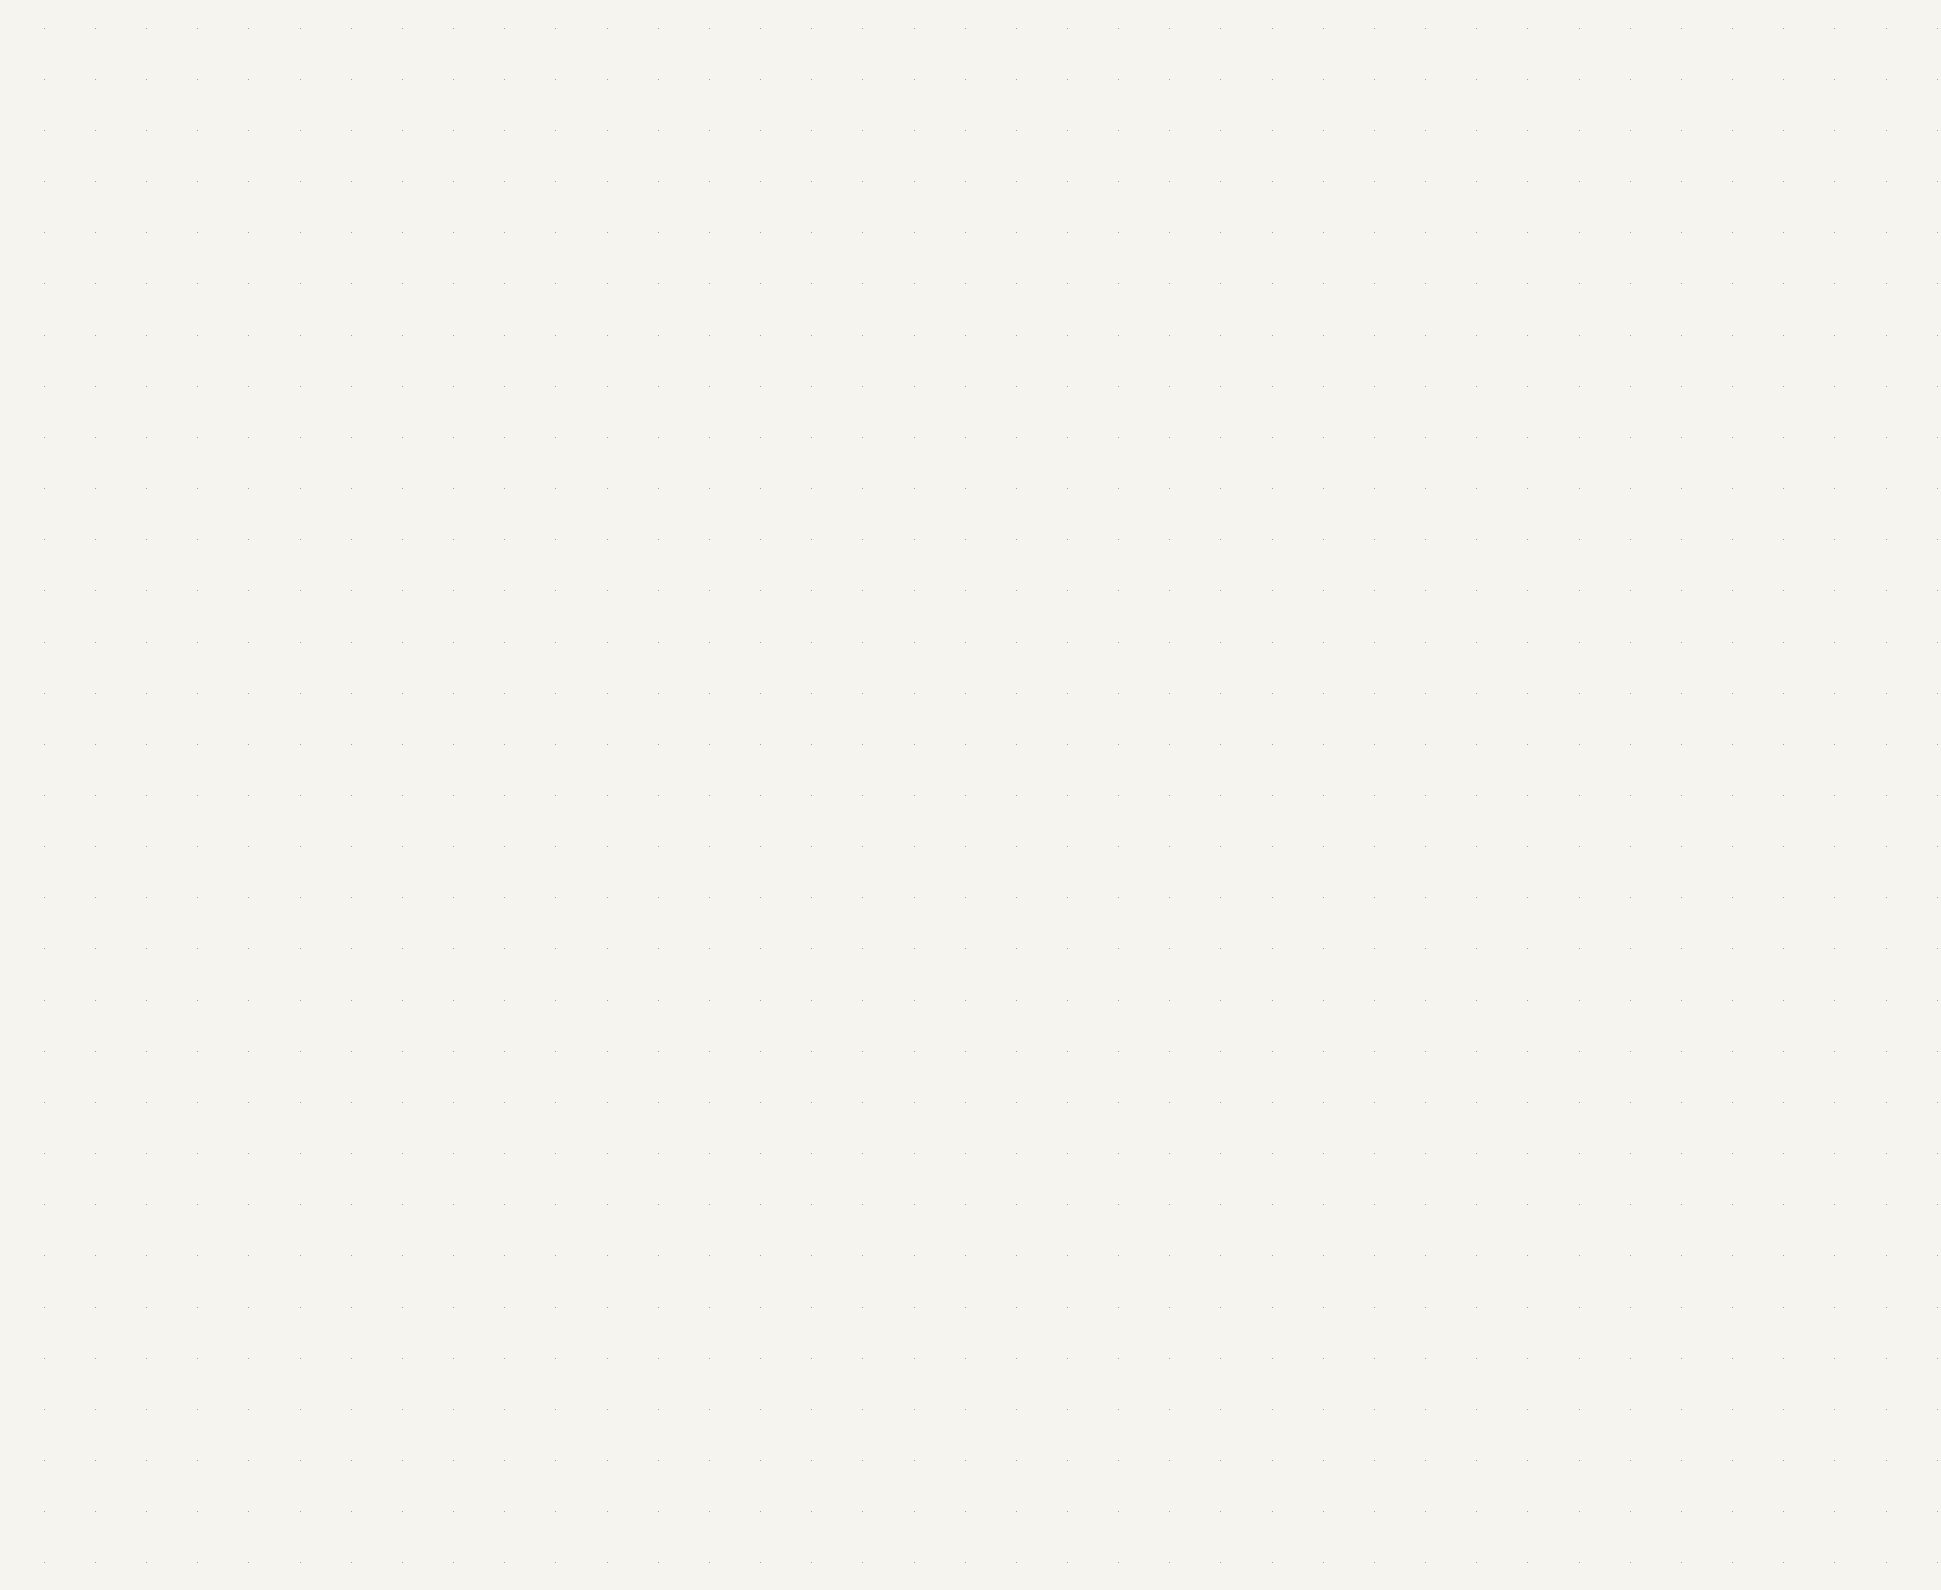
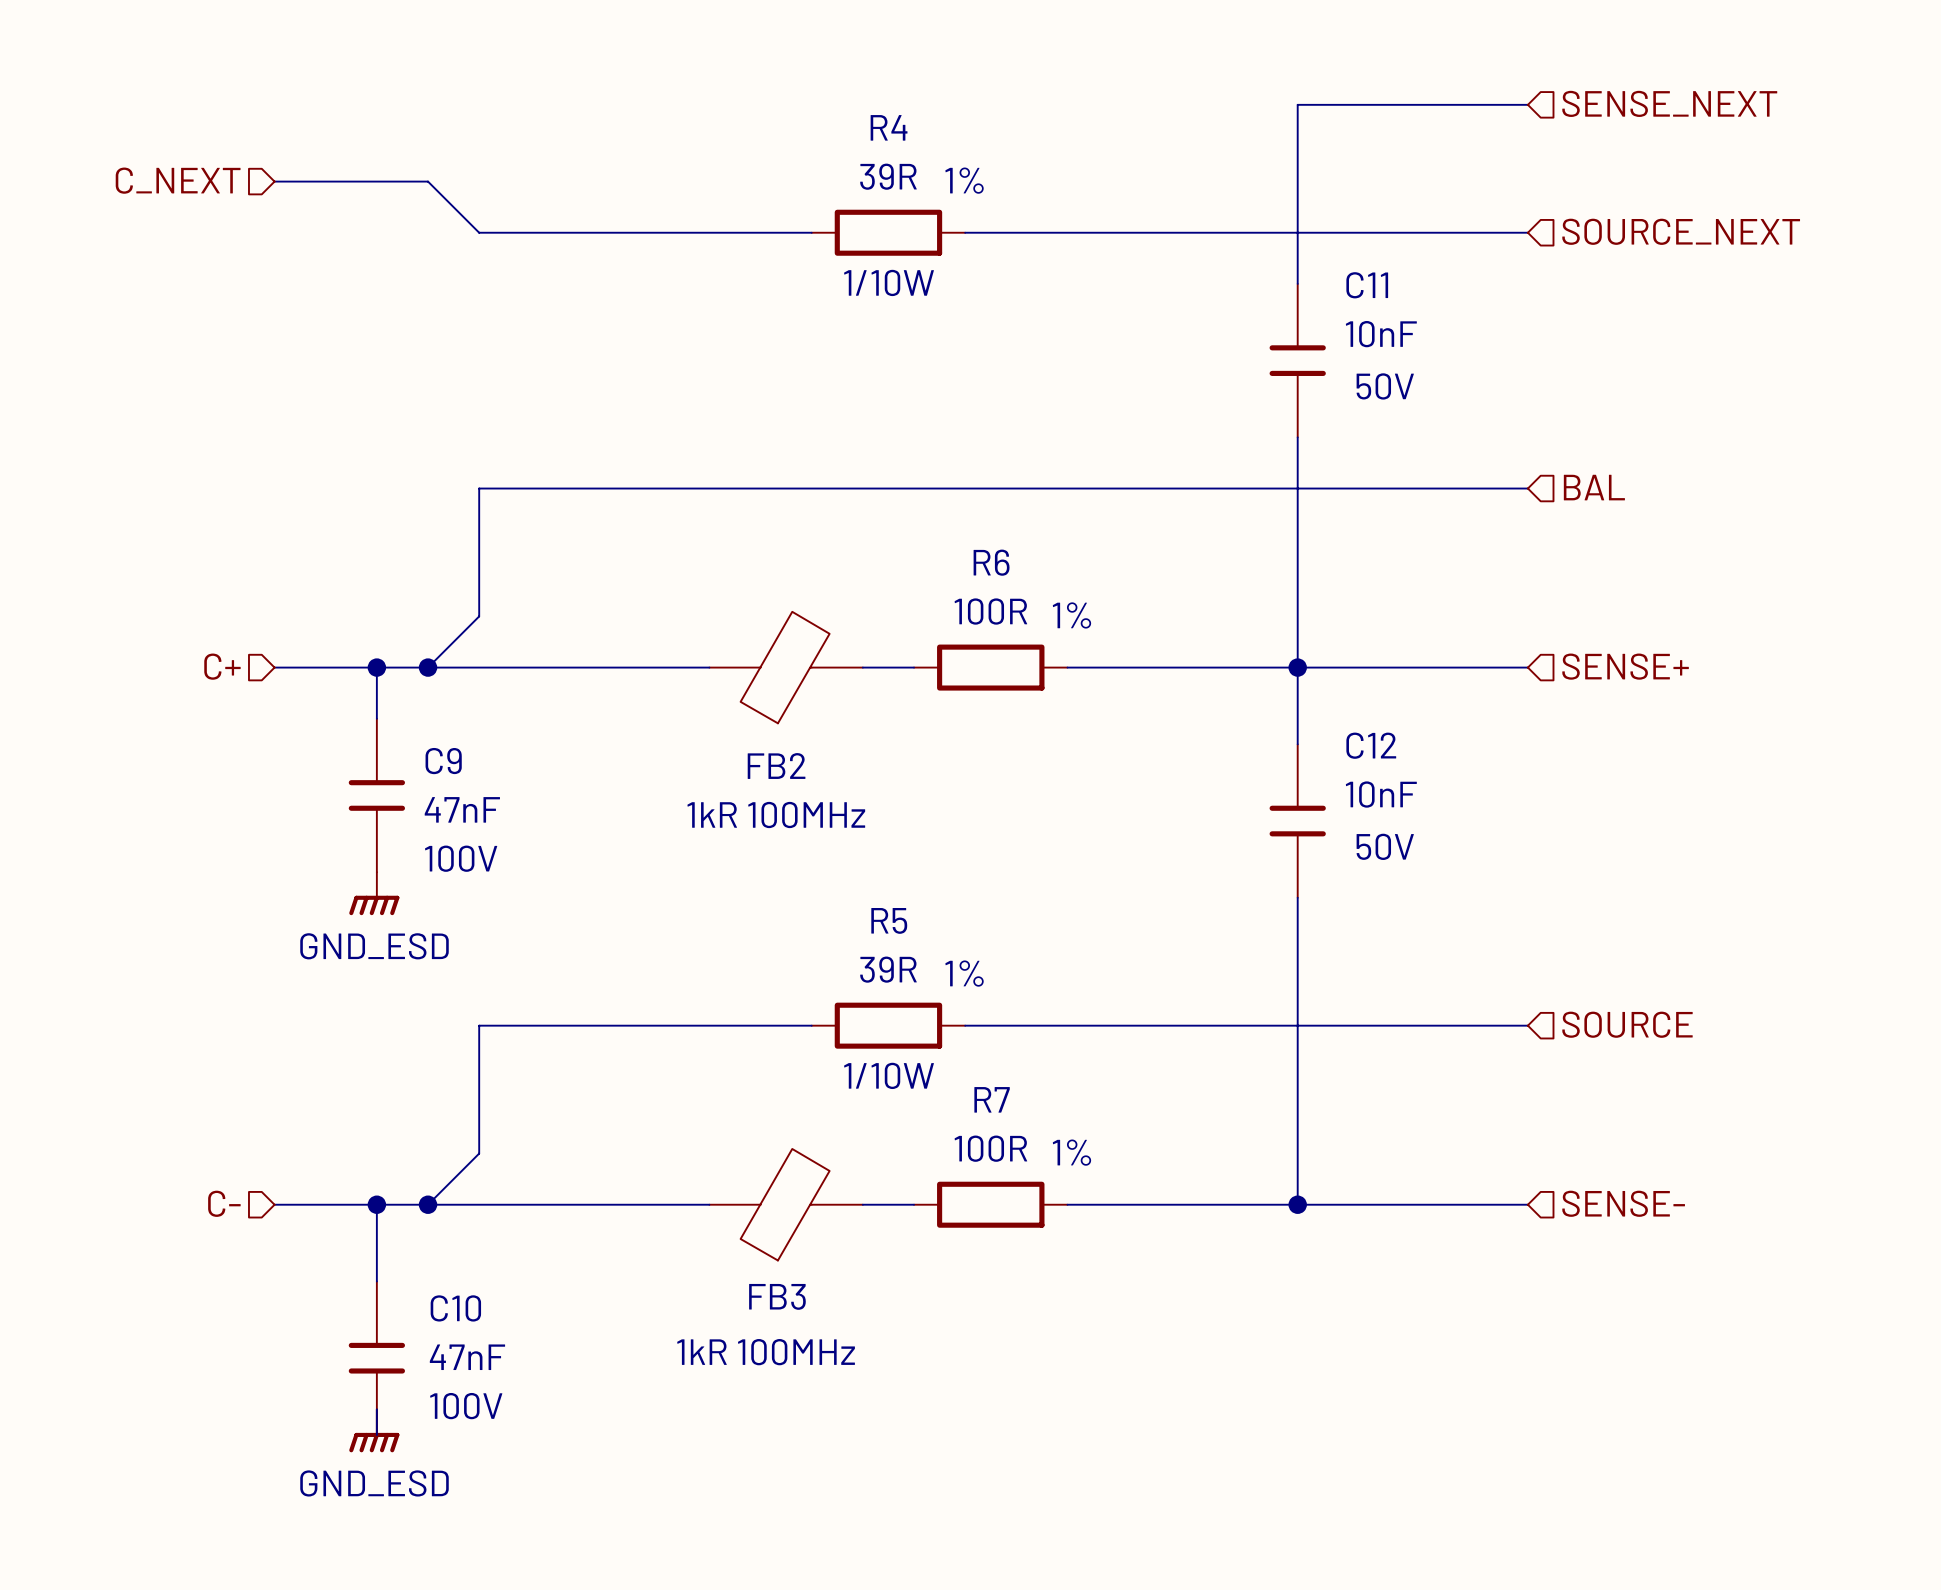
wire: none -> (1527, 104) (1297, 104) (1297, 283)
hierarchical label: none -> SENSE_NEXT (1669, 103)
hierarchical label: none -> C_NEXT (178, 180)
wire: none -> (274, 181) (428, 181) (479, 232) (811, 232)
R4: none -> 39R (888, 232)
wire: none -> (965, 232) (1527, 232)
hierarchical label: none -> SOURCE_NEXT (1681, 231)
C11: none -> 10nF (1297, 360)
wire: none -> (1297, 437) (1297, 744)
hierarchical label: none -> BAL (1594, 487)
wire: none -> (1527, 488) (479, 488) (479, 616) (428, 667)
hierarchical label: none -> C+ (222, 666)
hierarchical label: none -> SENSE+ (1625, 666)
wire: none -> (274, 667) (709, 667)
wire: none -> (376, 667) (376, 718)
junction: none -> (376, 667)
junction: none -> (428, 667)
FB2: none -> 1kR 100MHz (786, 667)
wire: none -> (862, 667) (914, 667)
R6: none -> 100R (990, 667)
wire: none -> (1067, 667) (1527, 667)
junction: none -> (1297, 667)
C9: none -> 47nF (376, 795)
C12: none -> 10nF (1297, 821)
power symbol: none -> GND_ESD (374, 893)
wire: none -> (1297, 897) (1297, 1204)
hierarchical label: none -> SOURCE (1627, 1024)
wire: none -> (811, 1025) (479, 1025) (479, 1153) (428, 1204)
R5: none -> 39R (888, 1025)
wire: none -> (965, 1025) (1527, 1025)
hierarchical label: none -> C- (224, 1203)
hierarchical label: none -> SENSE- (1623, 1203)
wire: none -> (274, 1204) (709, 1204)
wire: none -> (376, 1204) (376, 1281)
junction: none -> (376, 1204)
junction: none -> (428, 1204)
FB3: none -> 1kR 100MHz (786, 1204)
wire: none -> (862, 1204) (914, 1204)
R7: none -> 100R (990, 1204)
wire: none -> (1067, 1204) (1527, 1204)
junction: none -> (1297, 1204)
C10: none -> 47nF (376, 1358)
wire: none -> (376, 1409) (376, 1434)
power symbol: none -> GND_ESD (374, 1430)

